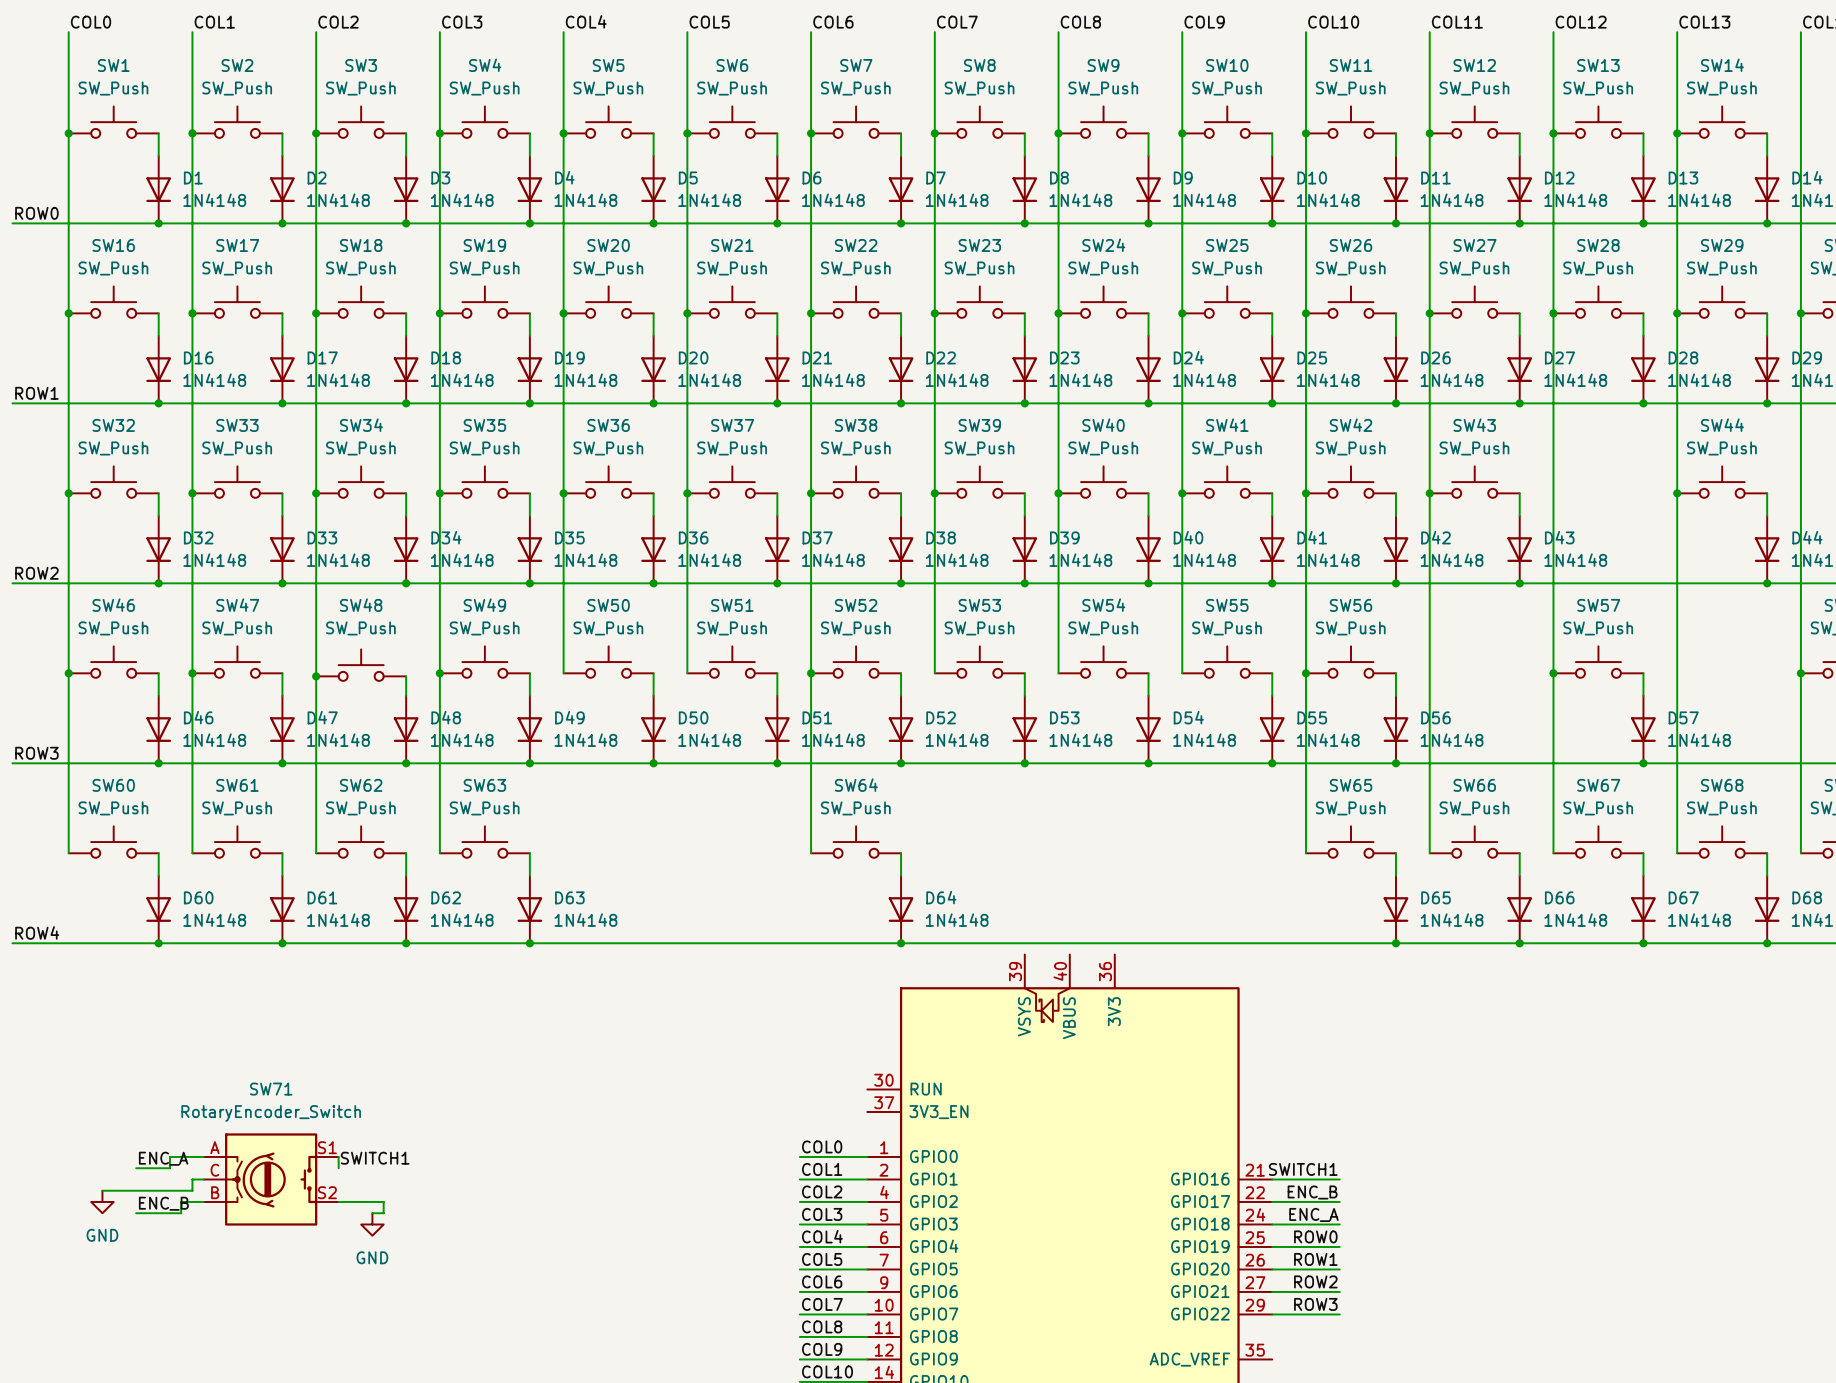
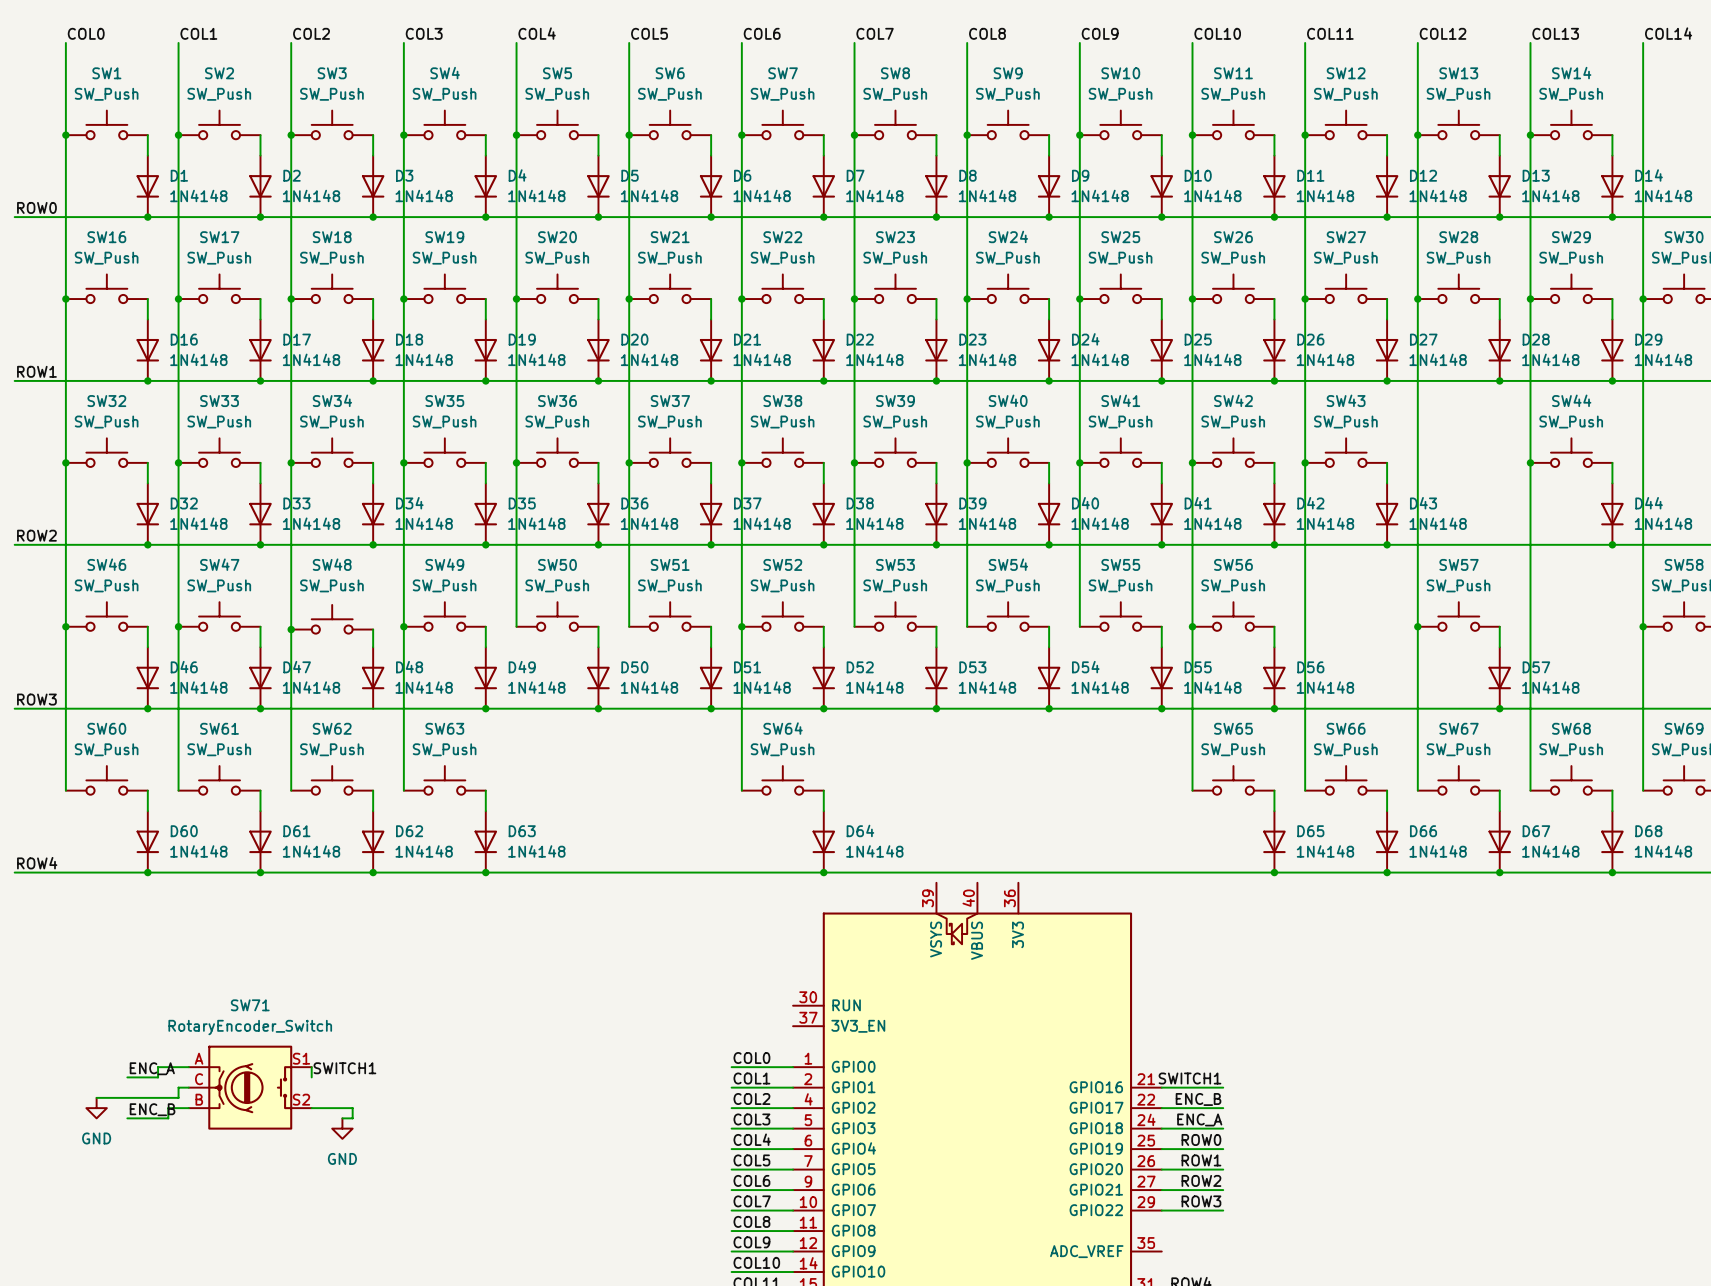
junction: (406, 763) -> none

